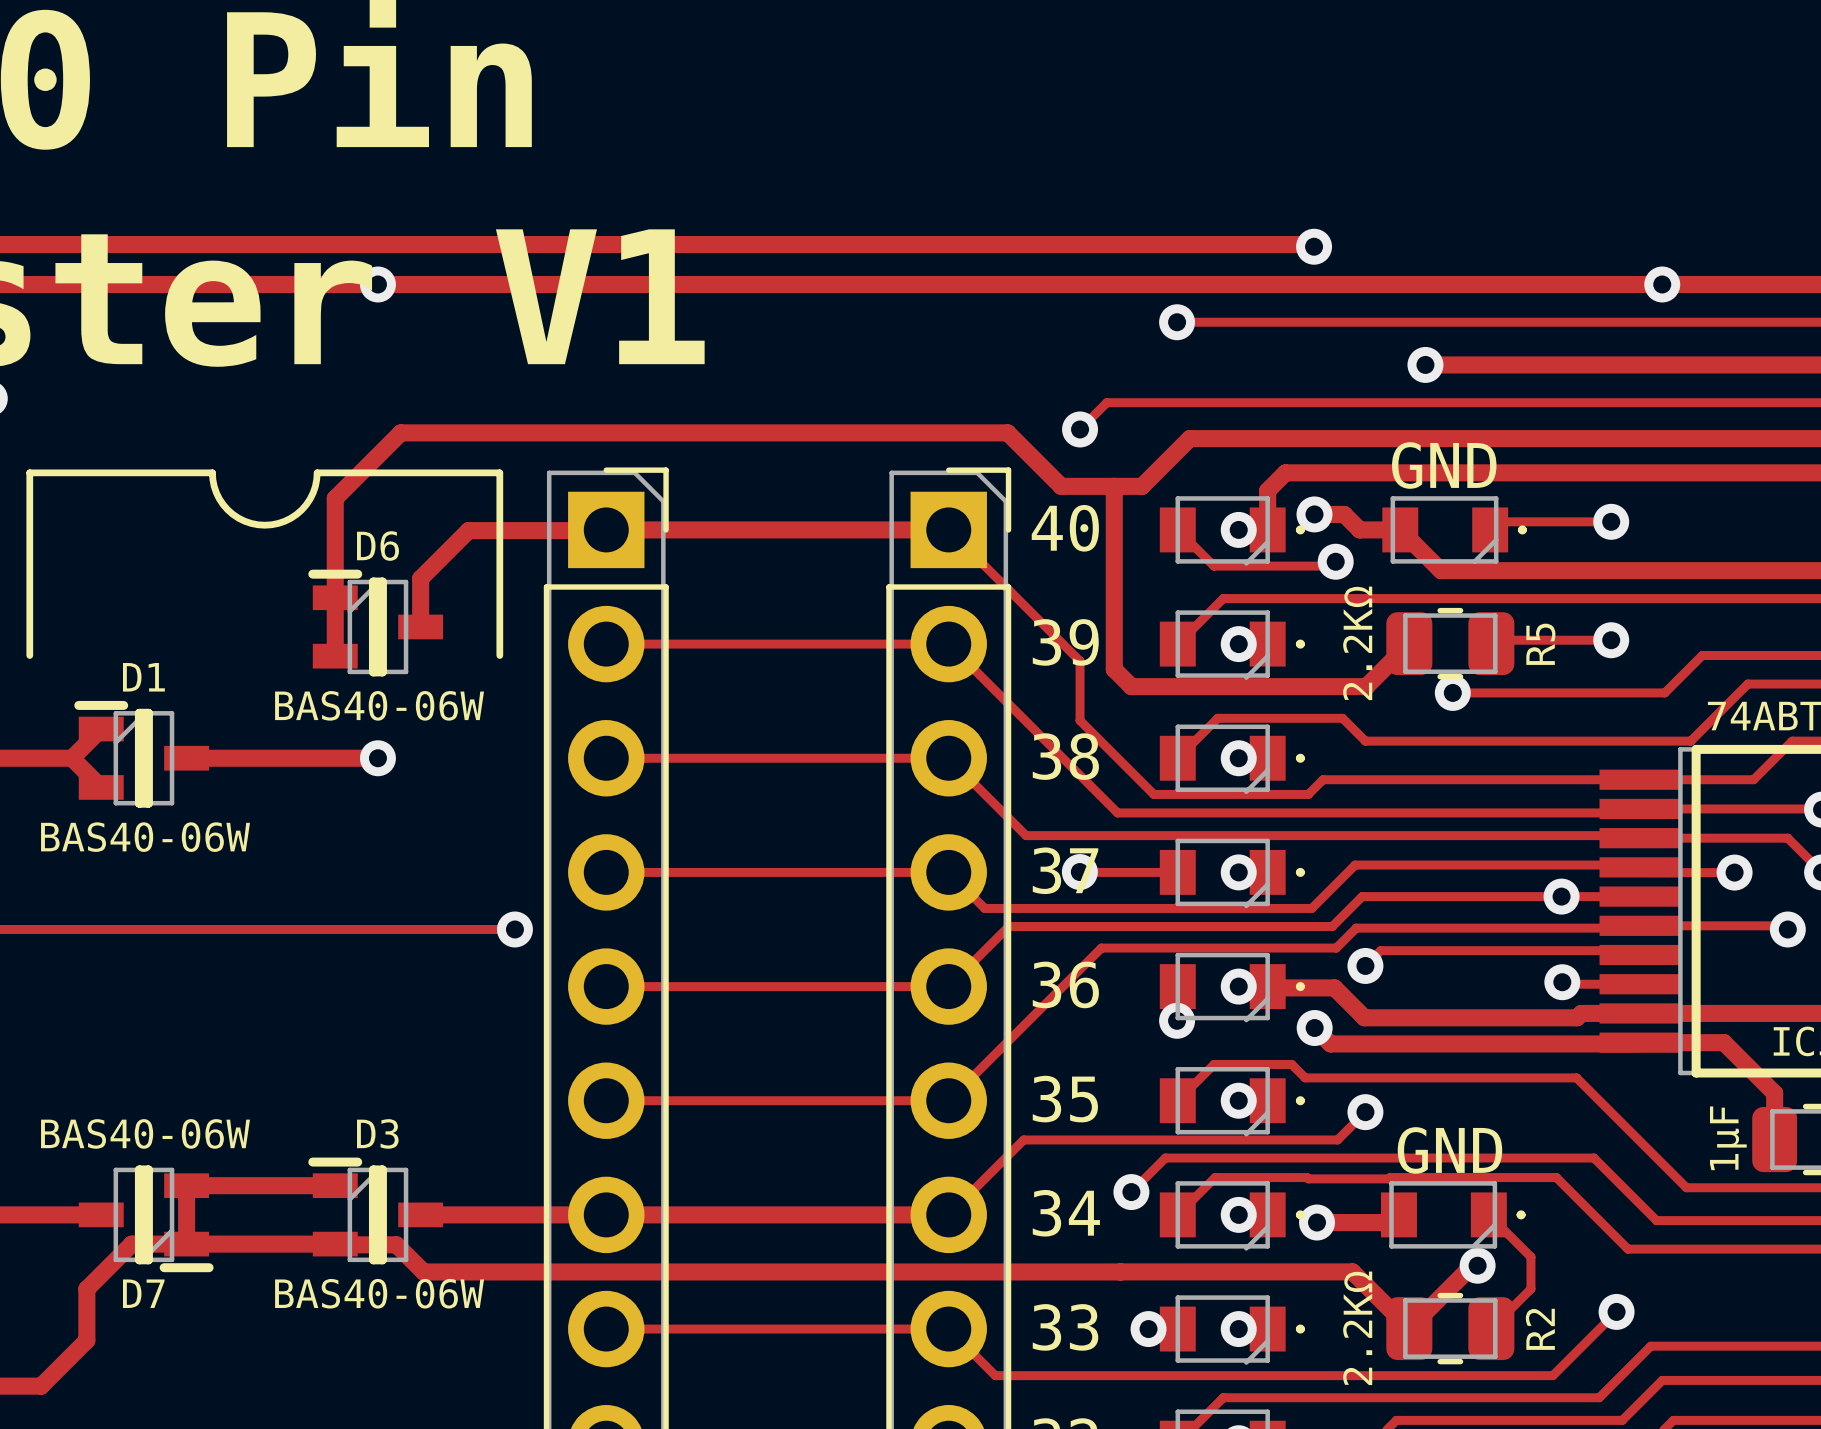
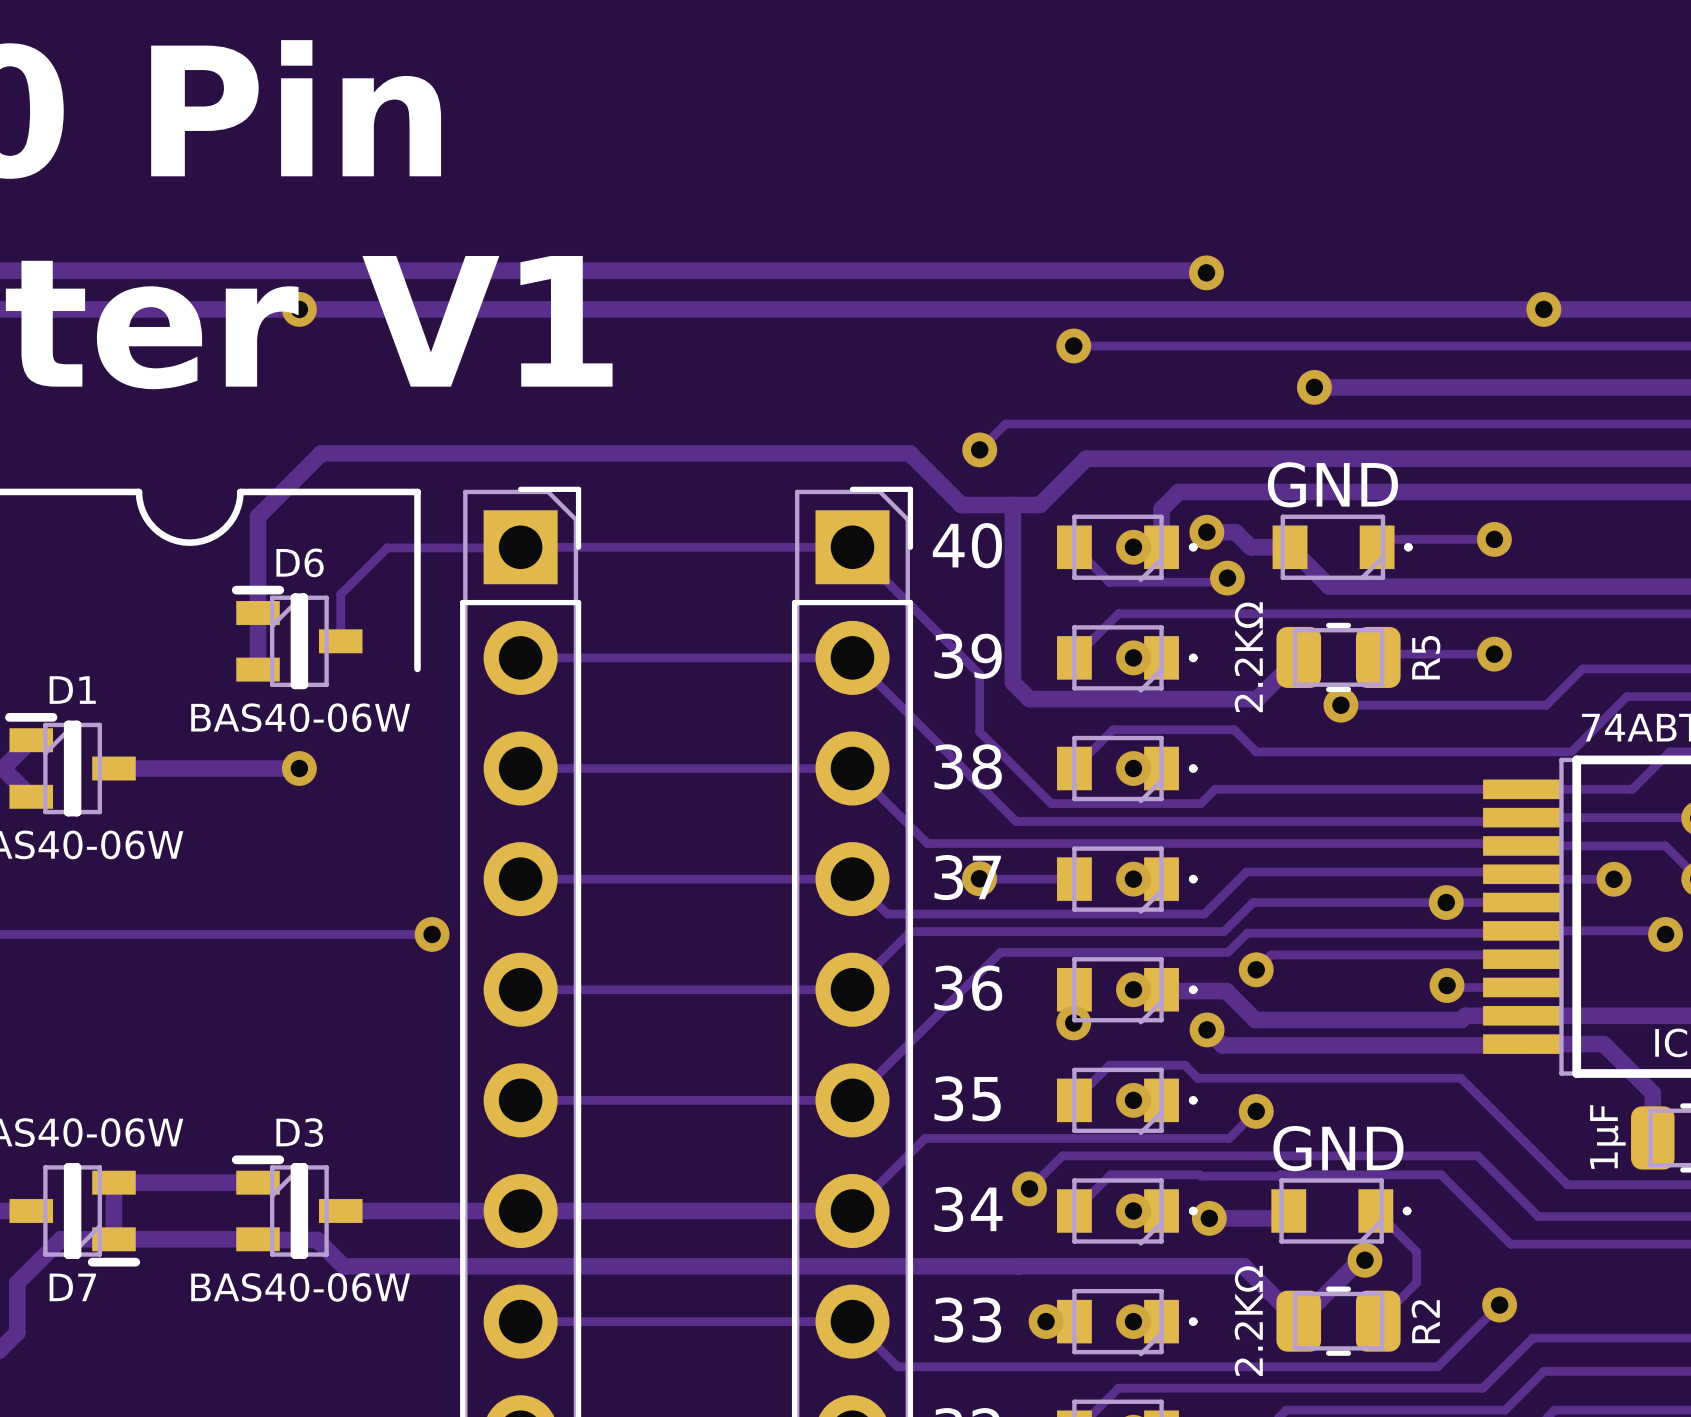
track width: thick (606, 529) (948, 529) -> thin (520, 547) (852, 547)
track width: thick (605, 530) (468, 530) (420, 578) (420, 626) -> thin (519, 547) (387, 547) (340, 594) (340, 641)

